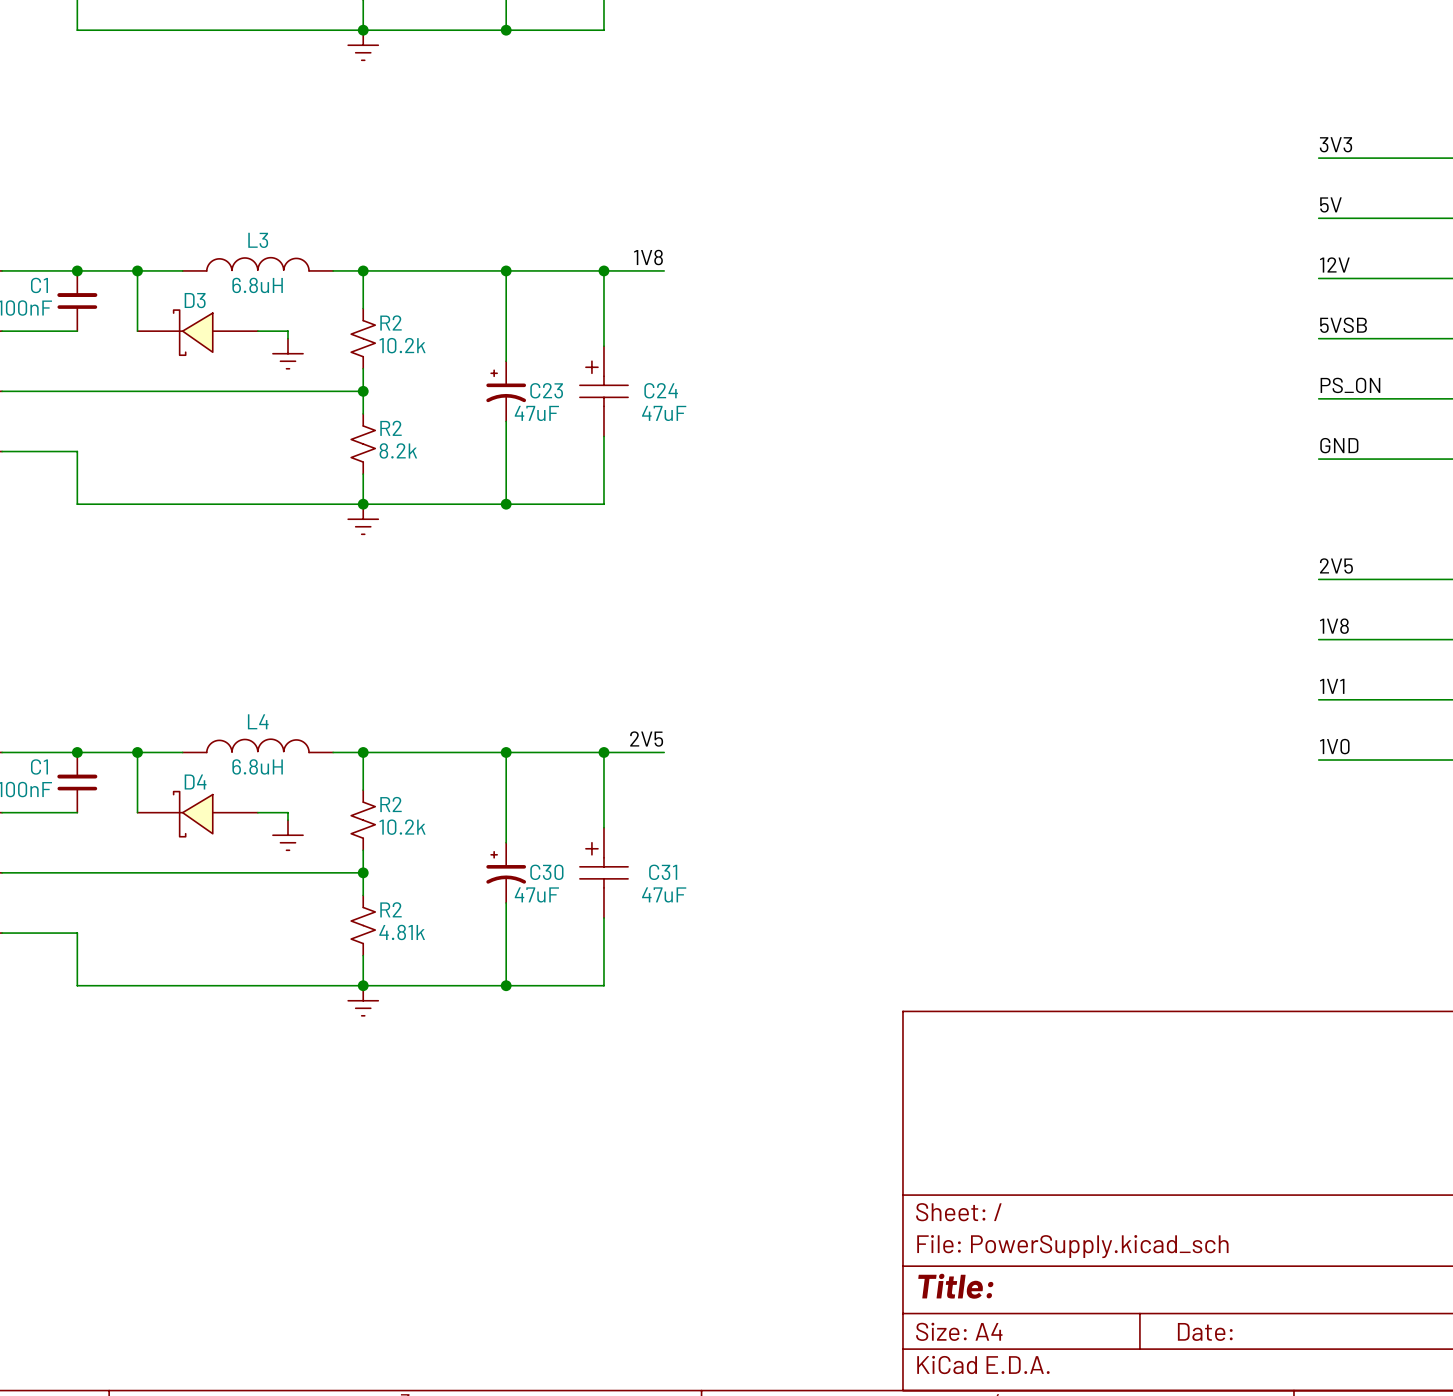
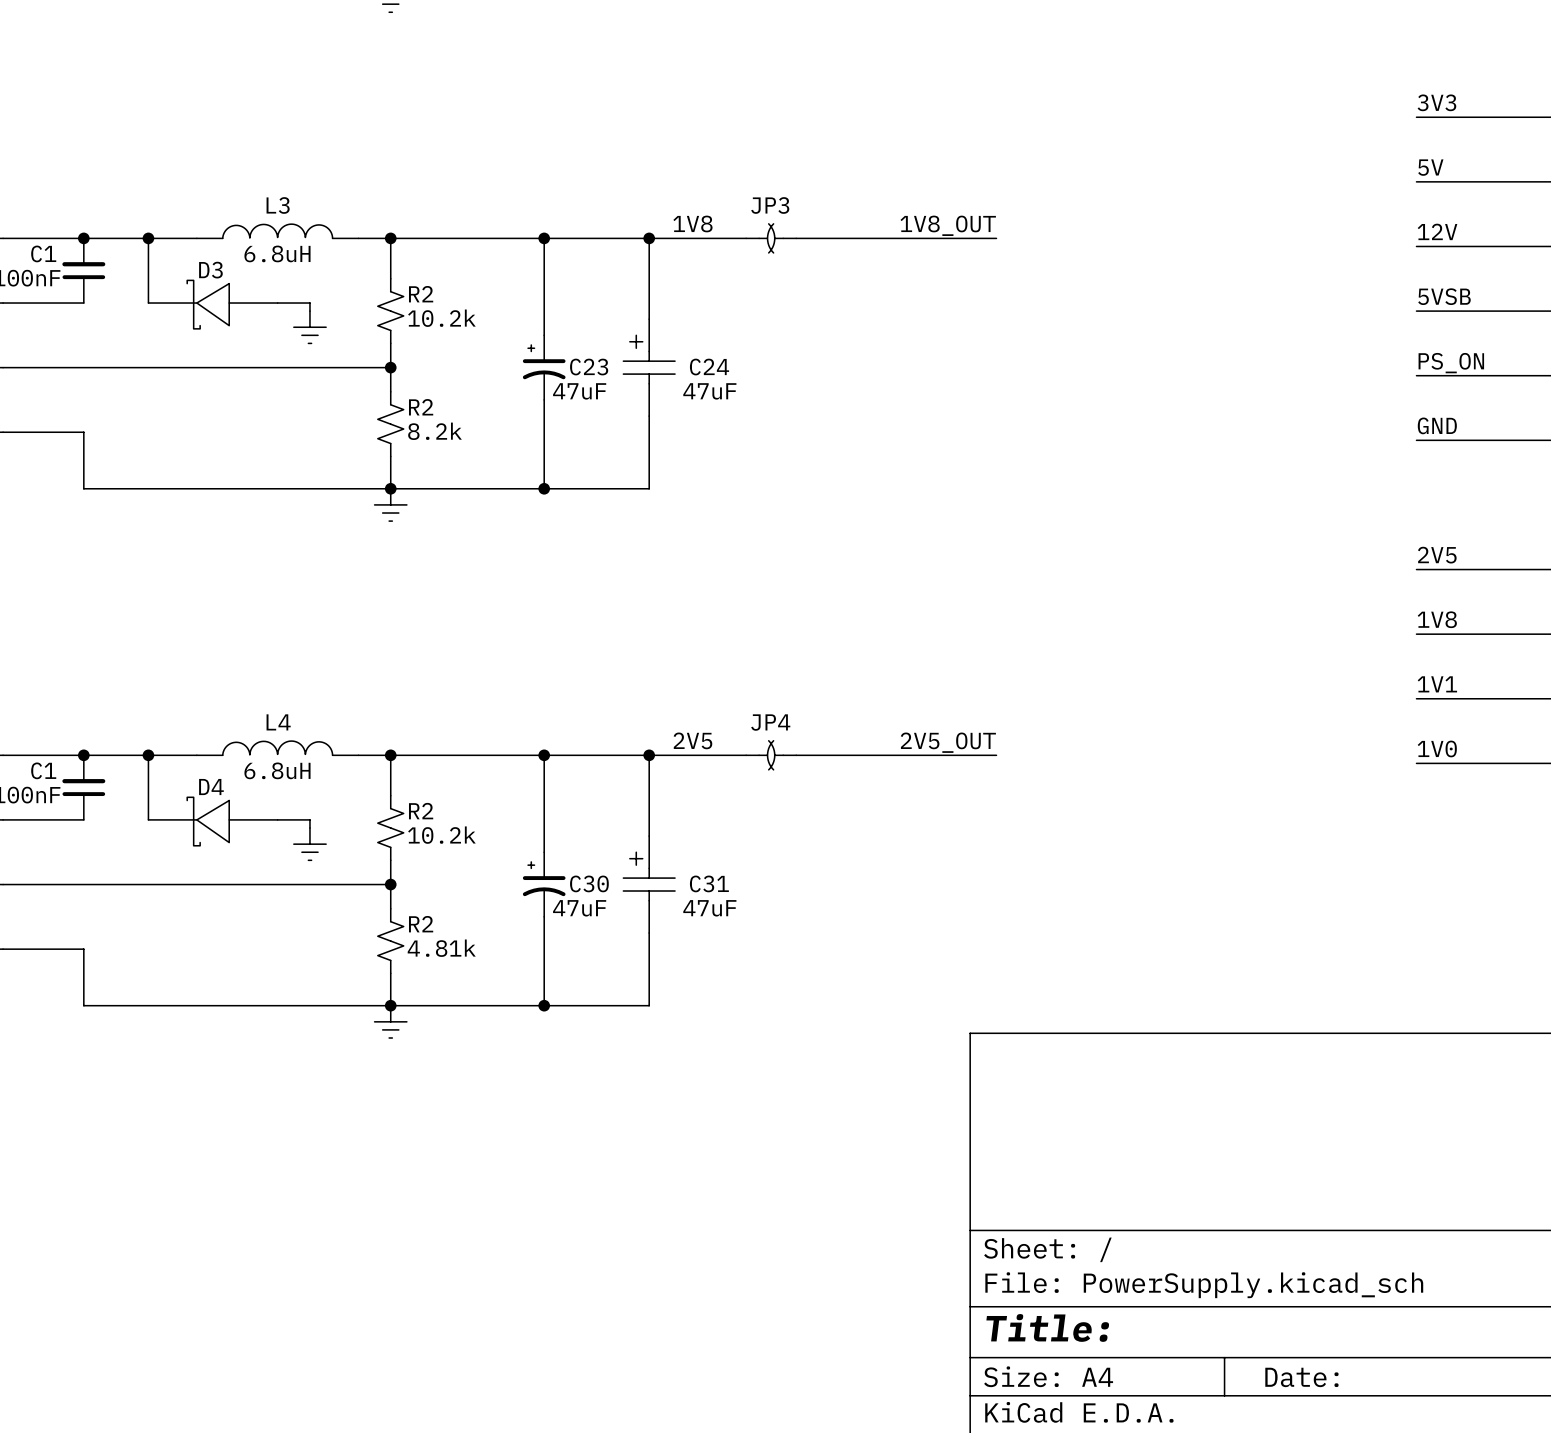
label: none -> 1V8_OUT (948, 225)
wire: none -> (713, 238) (746, 238)
JP3: none -> (771, 238)
wire: none -> (796, 238) (996, 238)
label: none -> 2V5_OUT (948, 742)
wire: none -> (713, 755) (746, 755)
JP4: none -> (771, 755)
wire: none -> (796, 755) (996, 755)

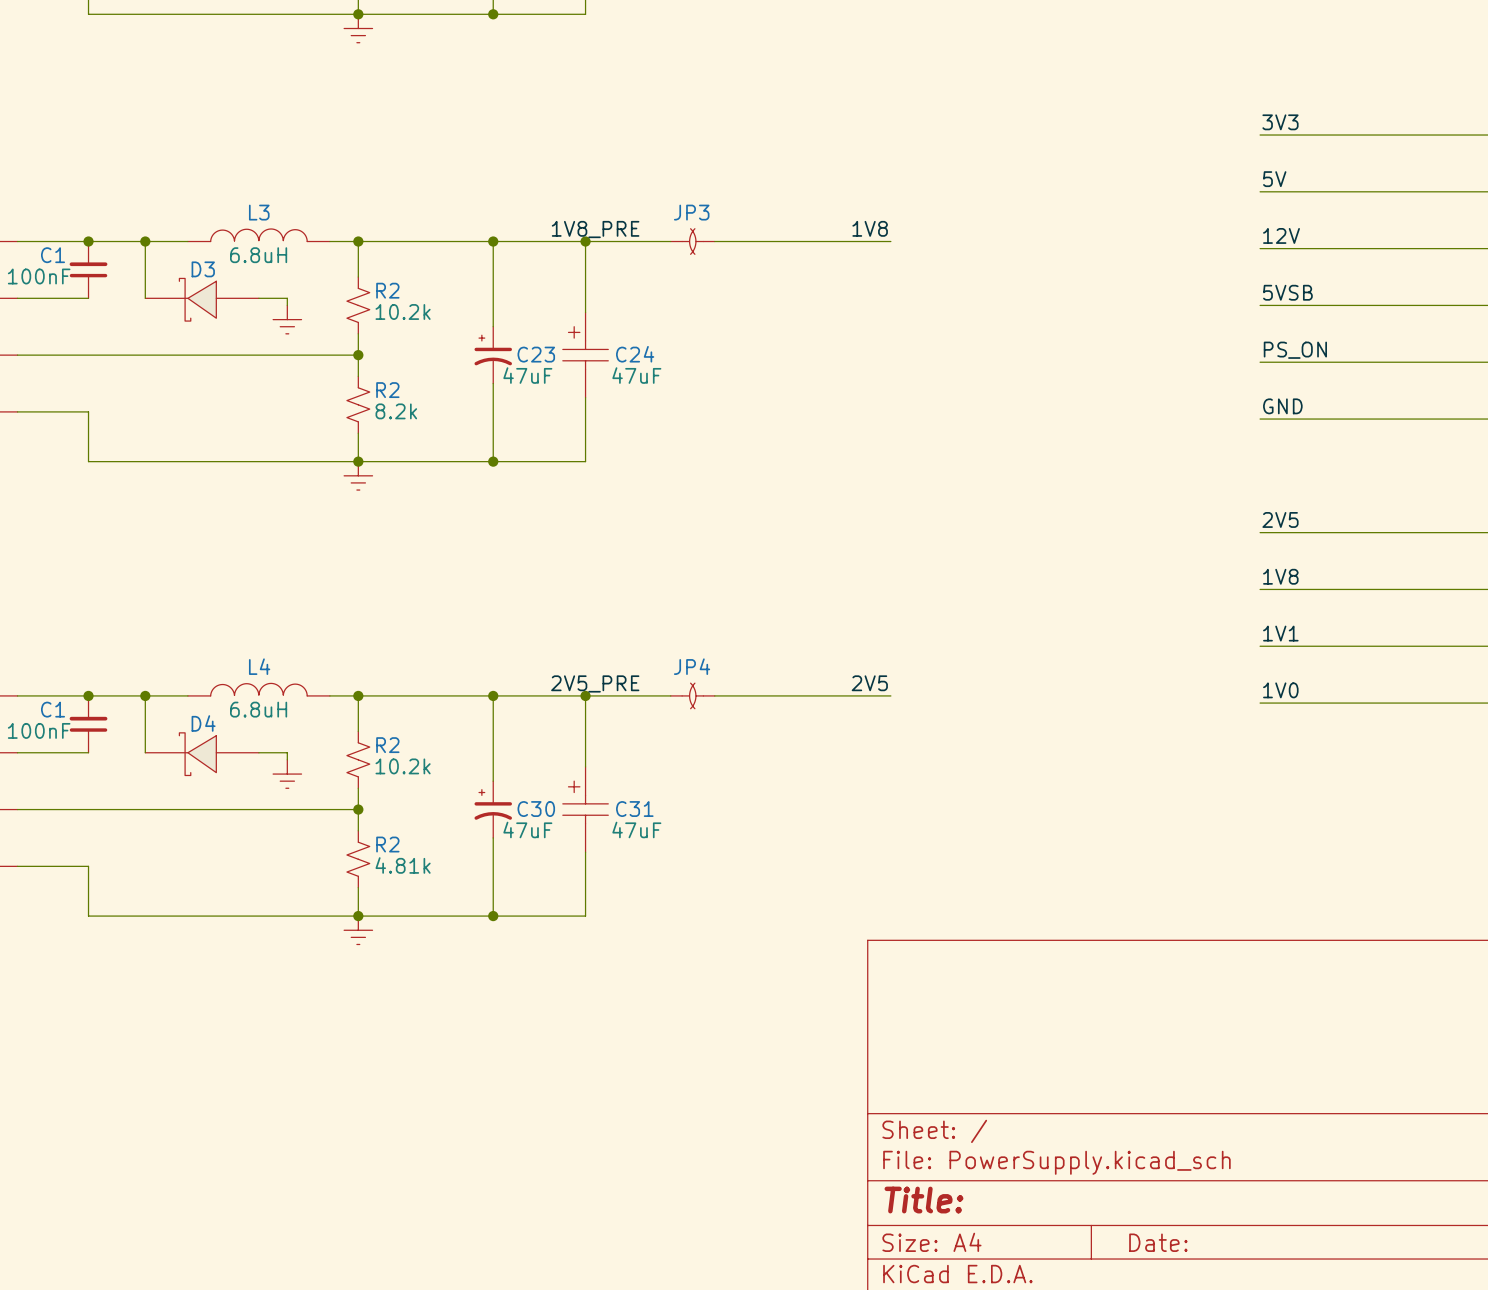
label: 1V8 (692, 223) -> 1V8_PRE (595, 229)
label: 1V8_OUT (948, 225) -> 1V8 (870, 228)
label: 2V5 (692, 740) -> 2V5_PRE (595, 683)
label: 2V5_OUT (948, 742) -> 2V5 (869, 683)

